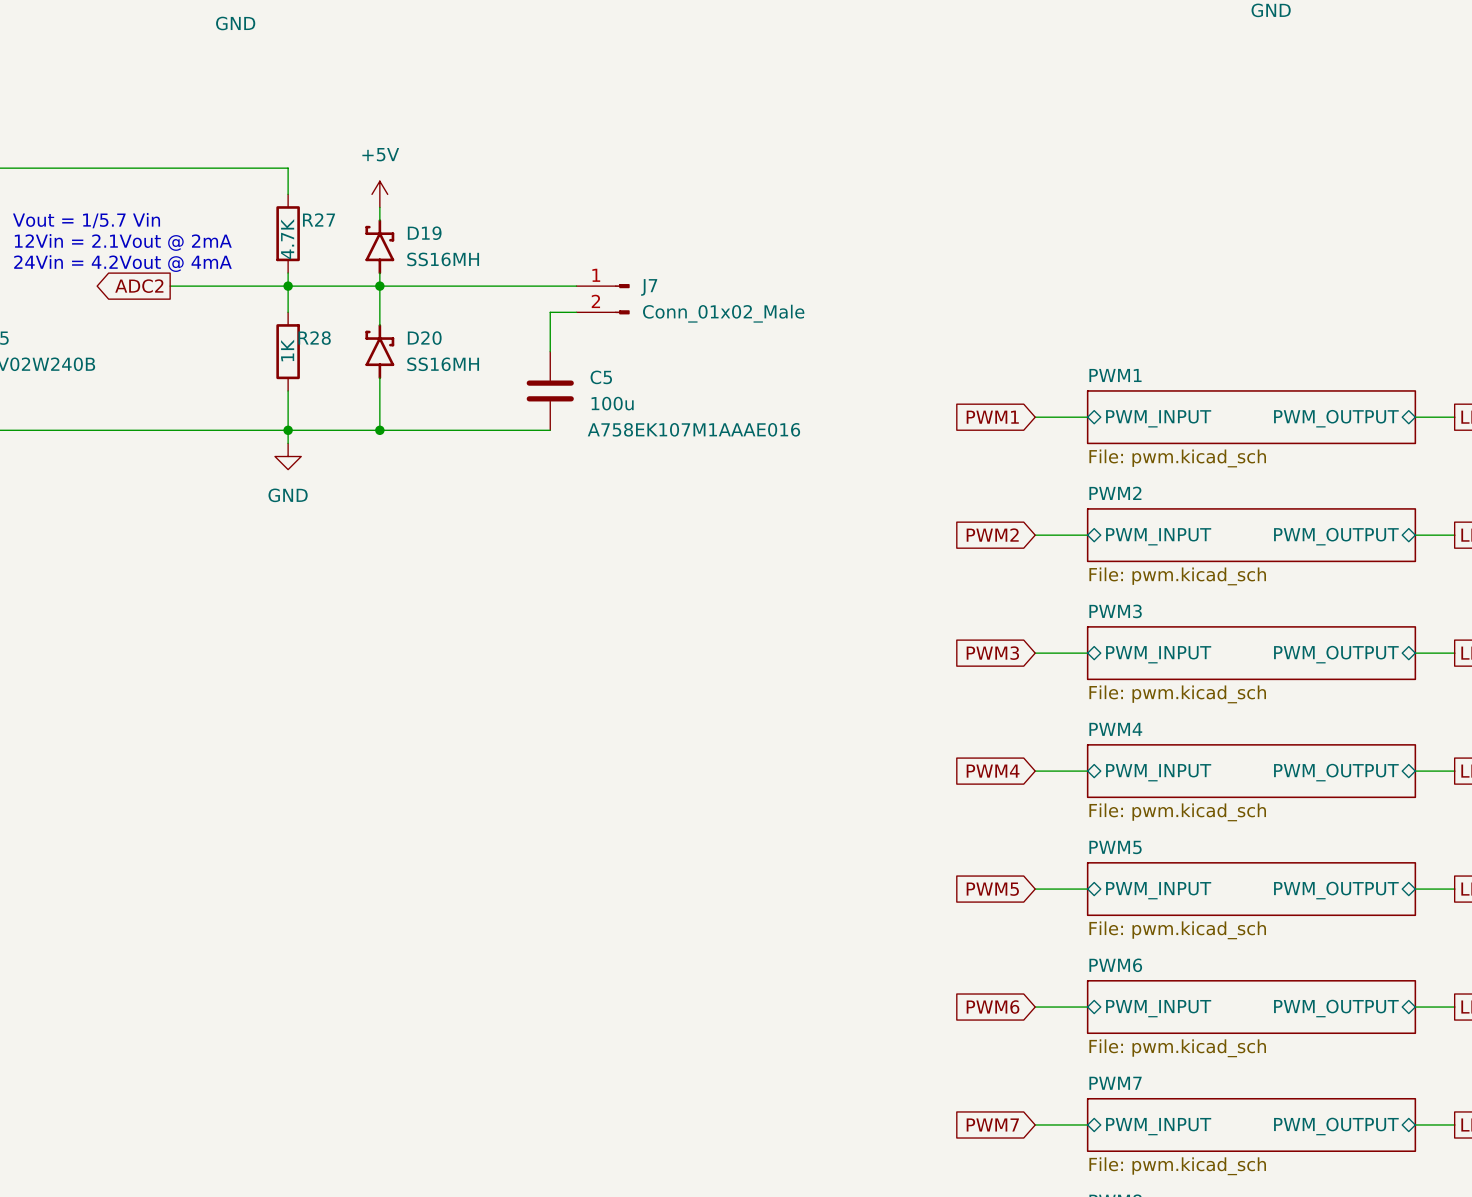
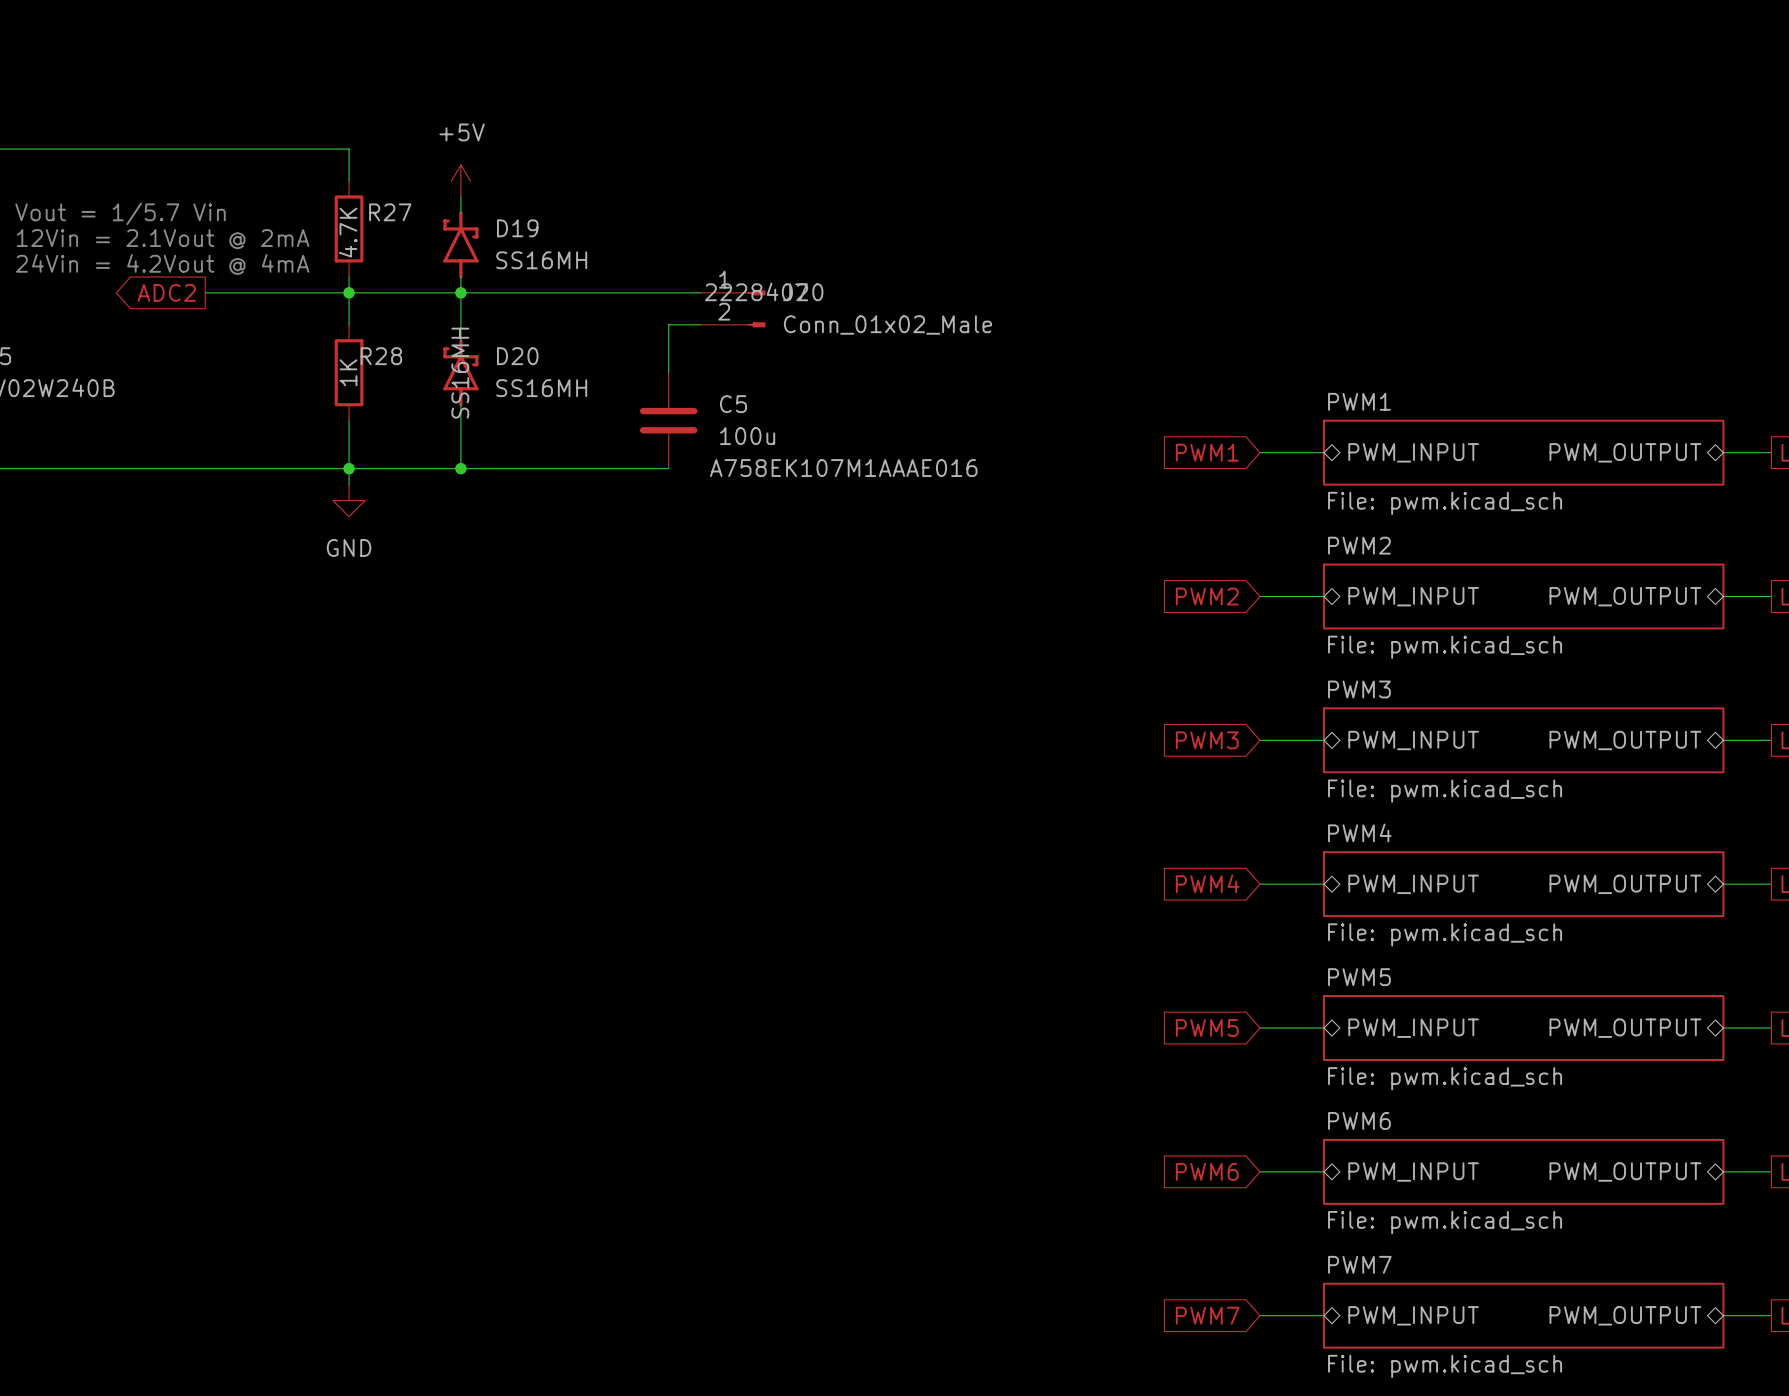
J7 text: none -> 22284020 (764, 291)
D20 text: none -> SS16MH (460, 373)

